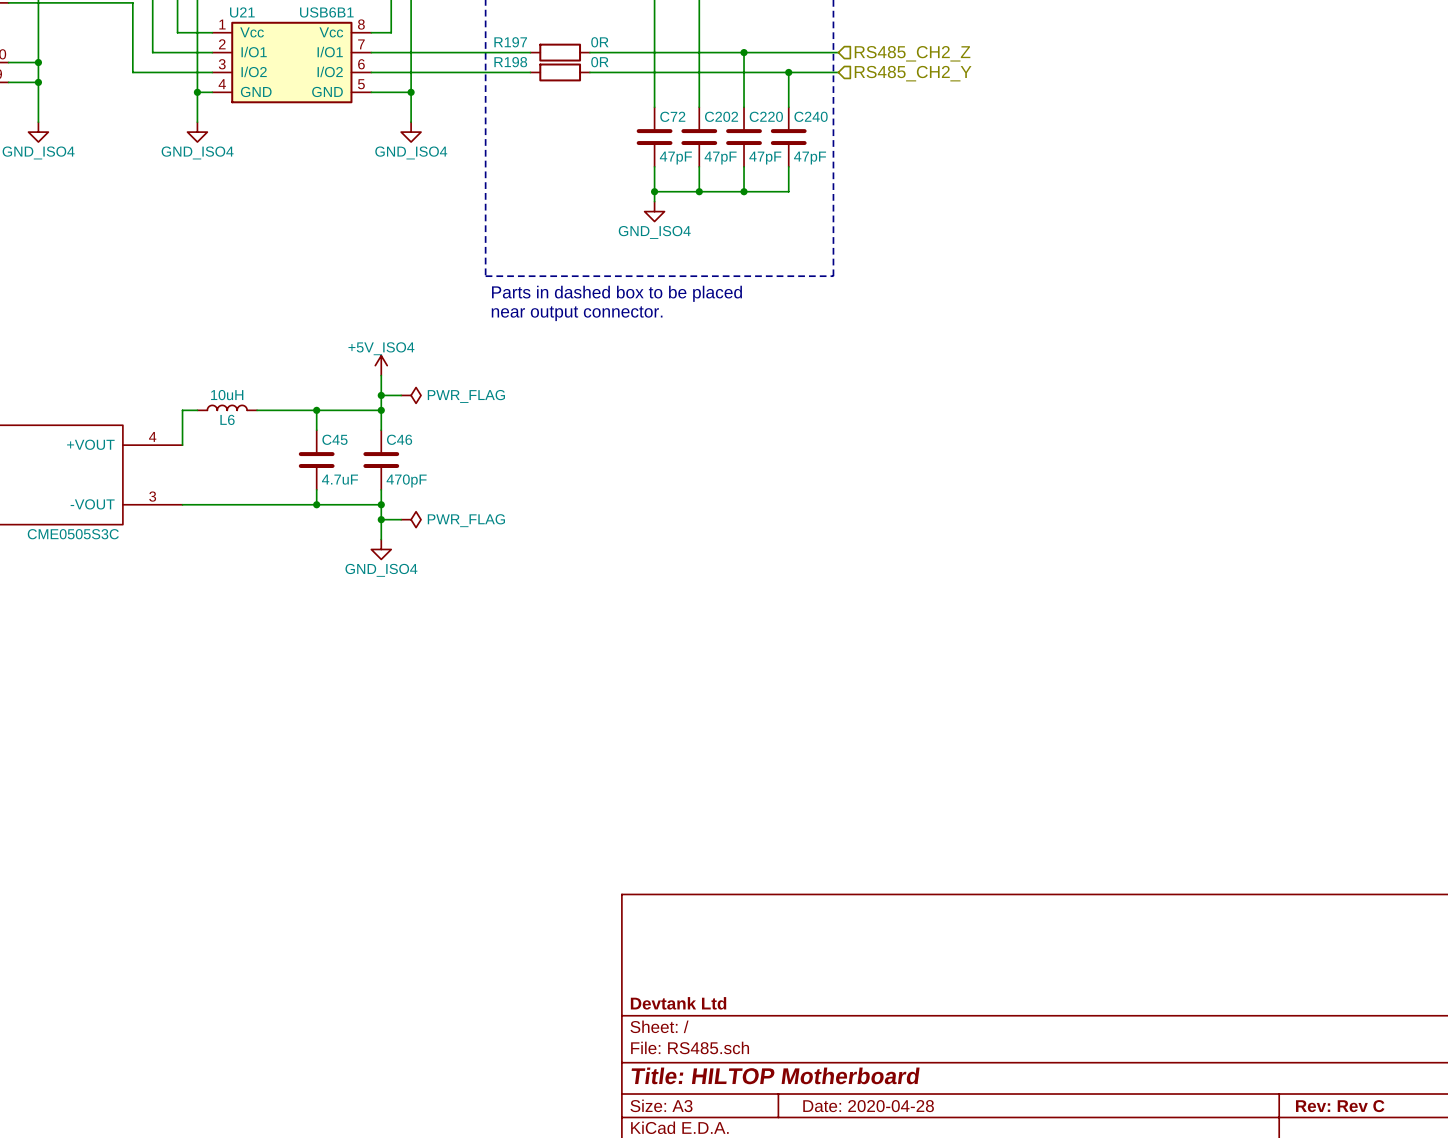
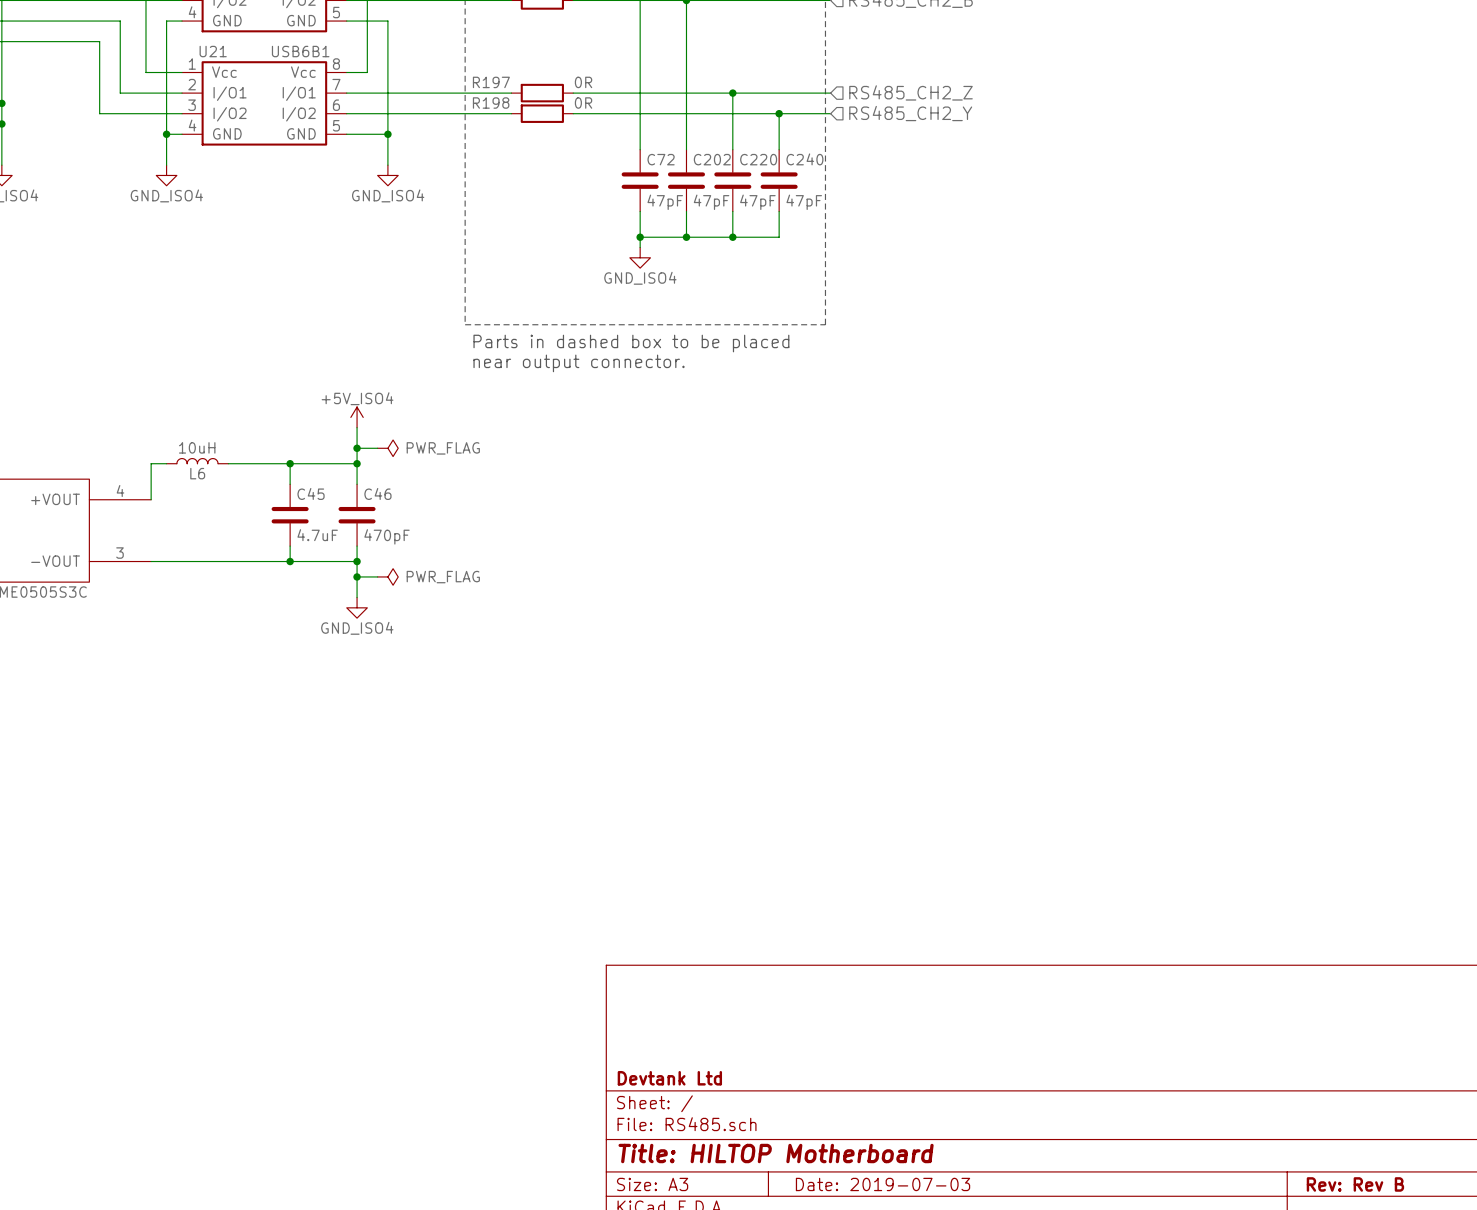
title block: Date: 2020-04-28 (868, 1106) -> Date: 2019-07-03 (883, 1184)
title block: Rev: Rev C (1340, 1106) -> Rev: Rev B (1355, 1184)

